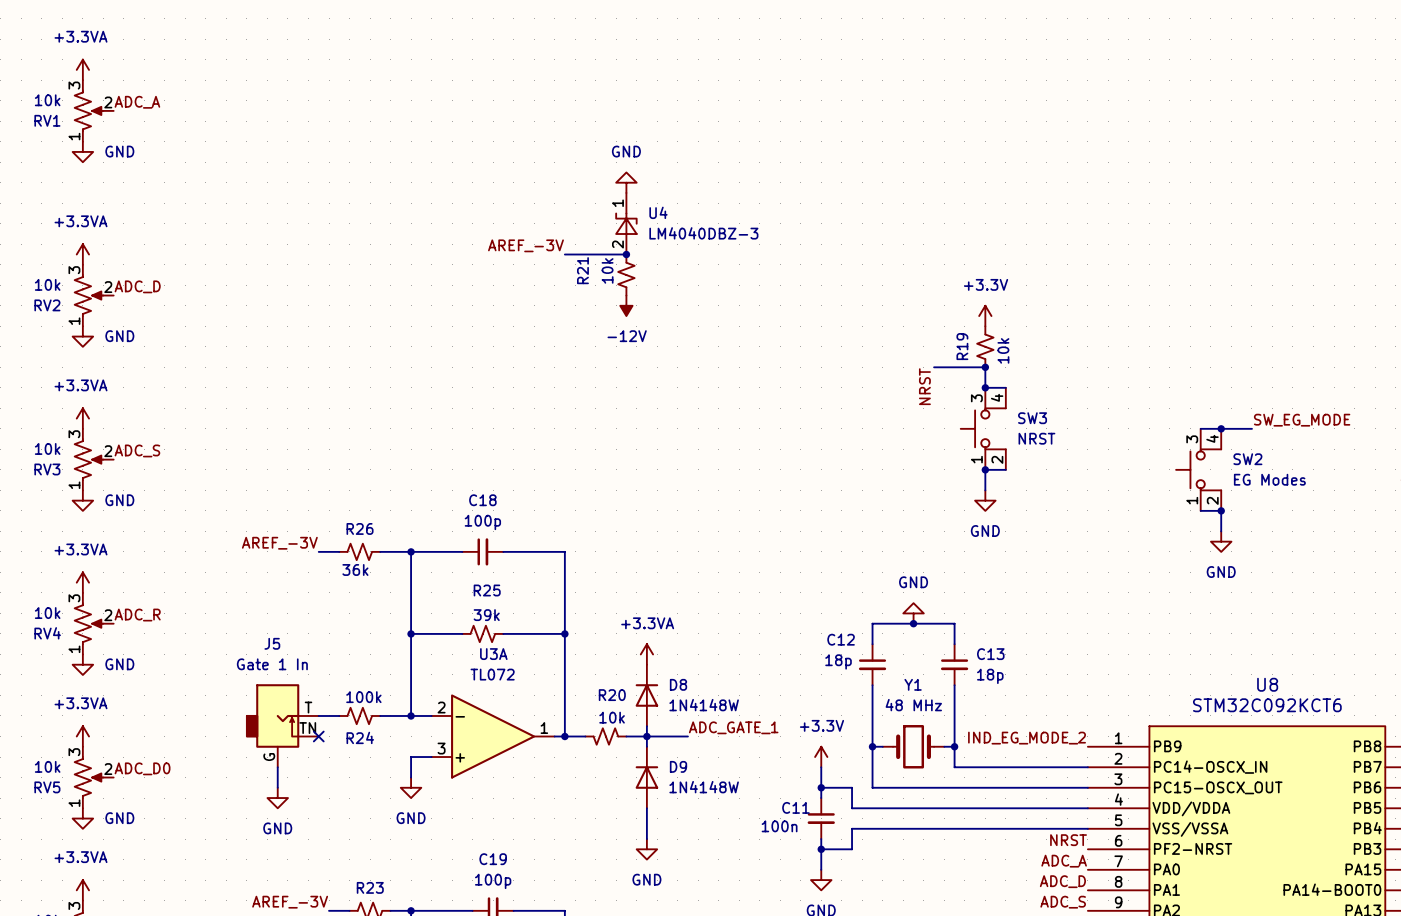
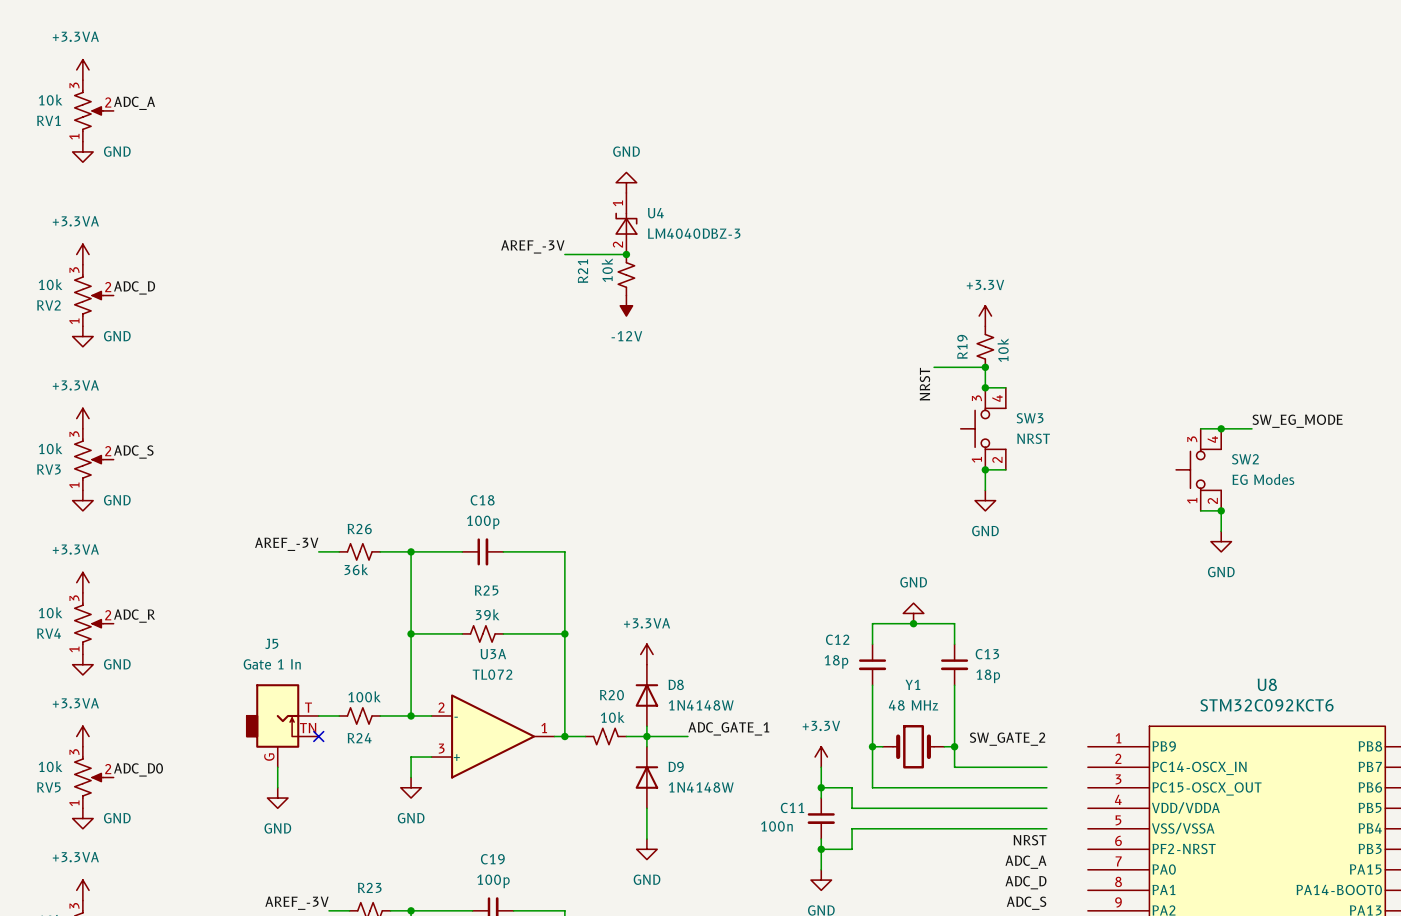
label: none -> SW_GATE_2 (1007, 739)
label: IND_EG_MODE_2 (1027, 738) -> none
wire: (1046, 767) (1087, 767) -> none
wire: (1046, 787) (1087, 787) -> none
wire: (1046, 808) (1087, 808) -> none
wire: (1046, 828) (1087, 828) -> none
label position: NRST (1068, 840) -> NRST (1029, 840)
label position: ADC_A (1064, 861) -> ADC_A (1025, 862)
label position: ADC_D (1062, 881) -> ADC_D (1025, 882)
label position: ADC_S (1063, 902) -> ADC_S (1026, 903)

